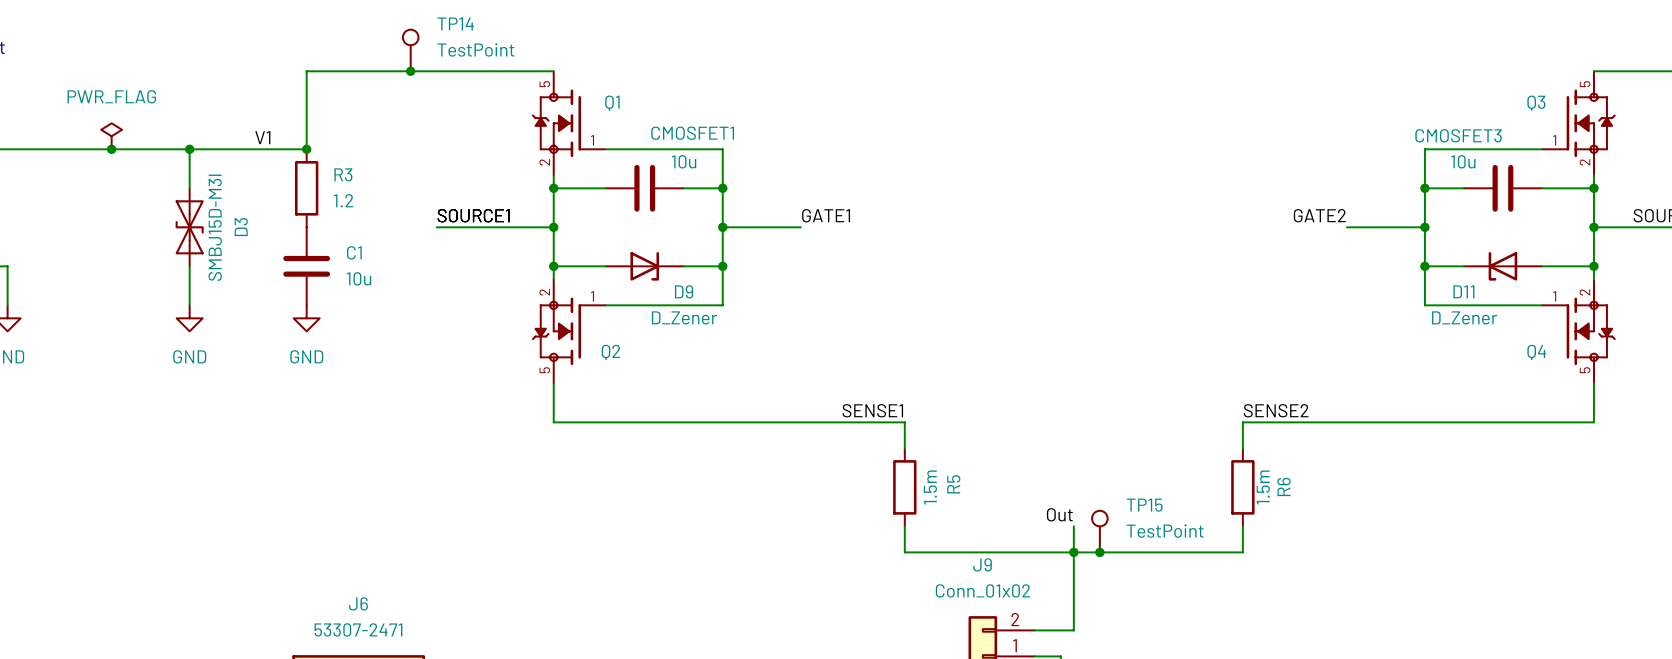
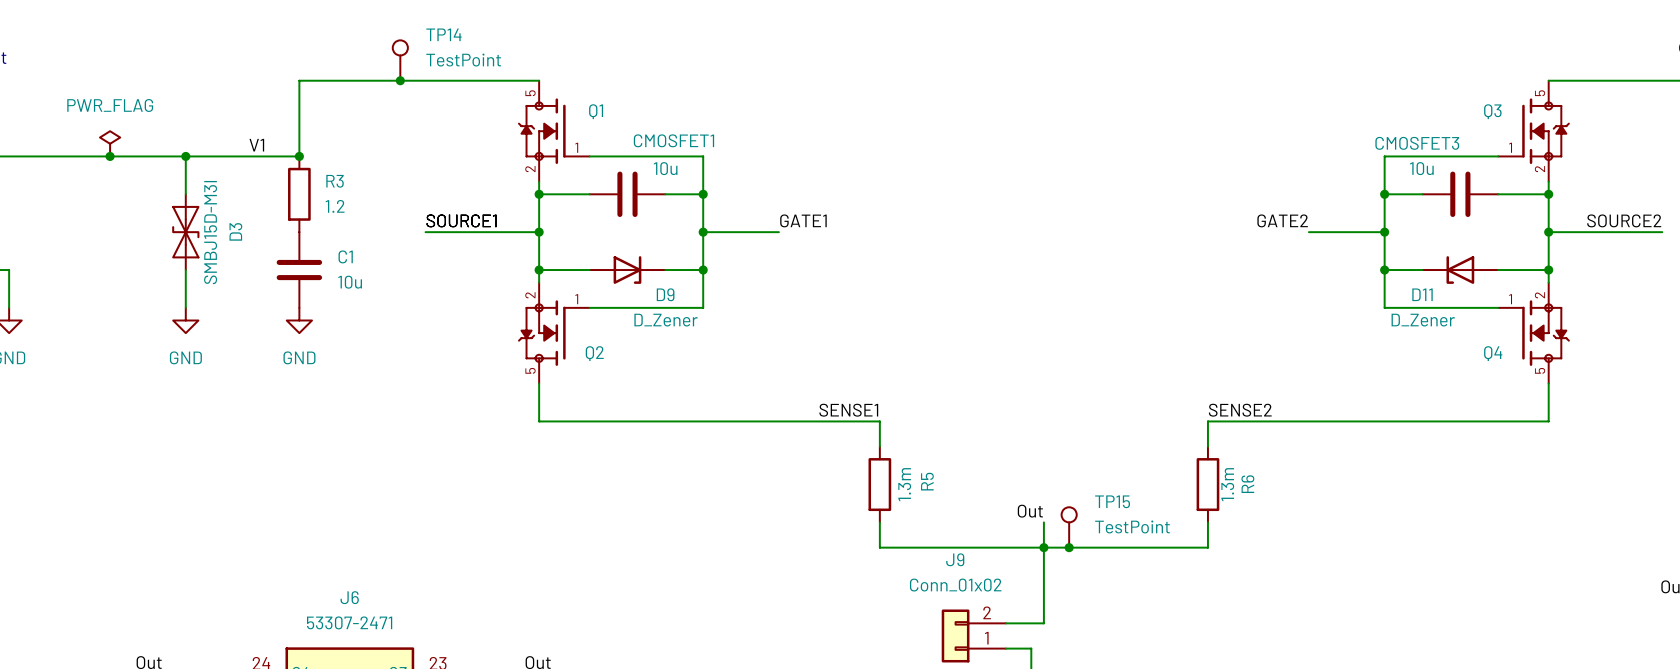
R5 value: 1.5m (930, 487) -> 1.3m (904, 484)
R6 value: 1.5m (1263, 487) -> 1.3m (1227, 484)

